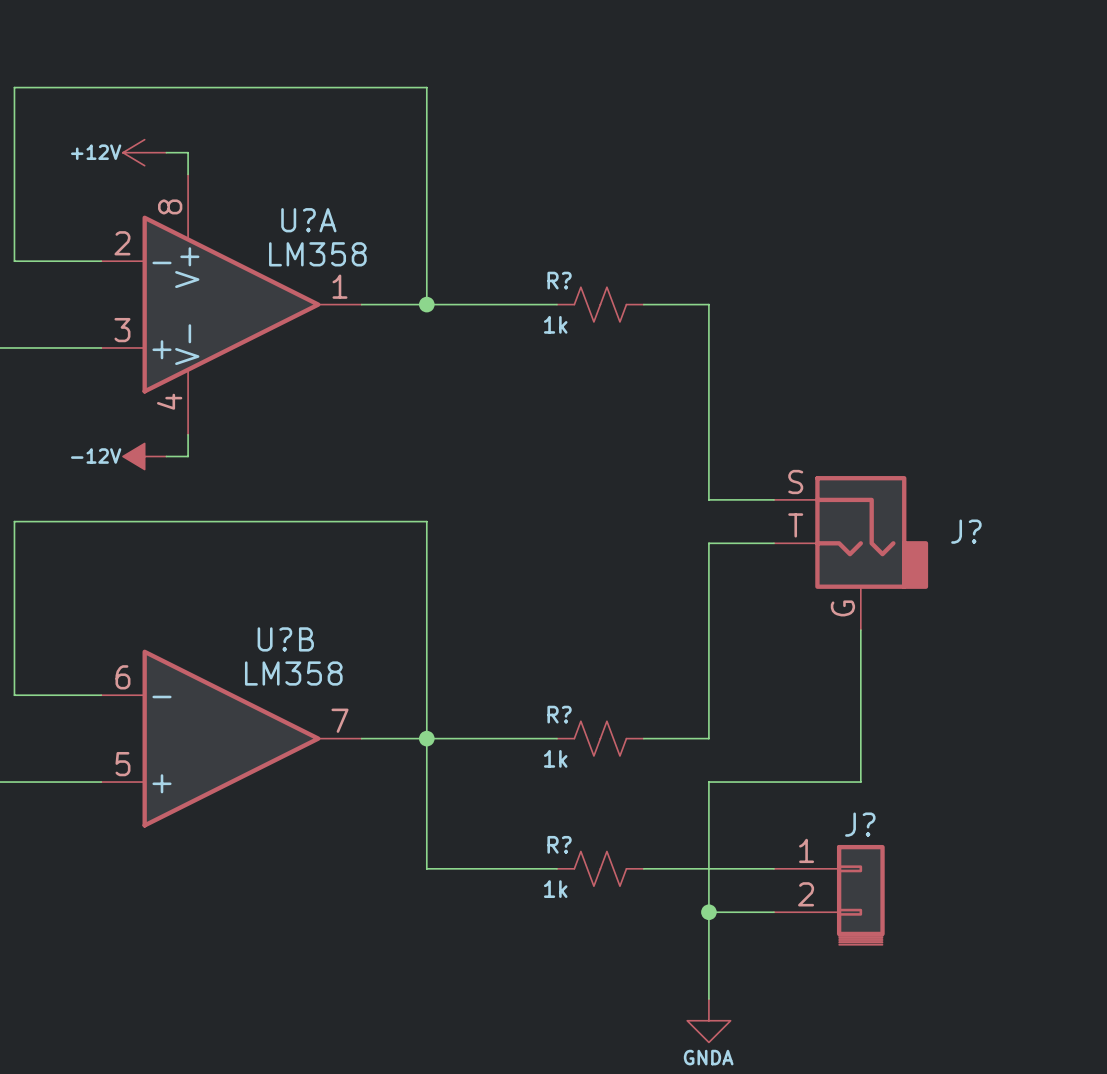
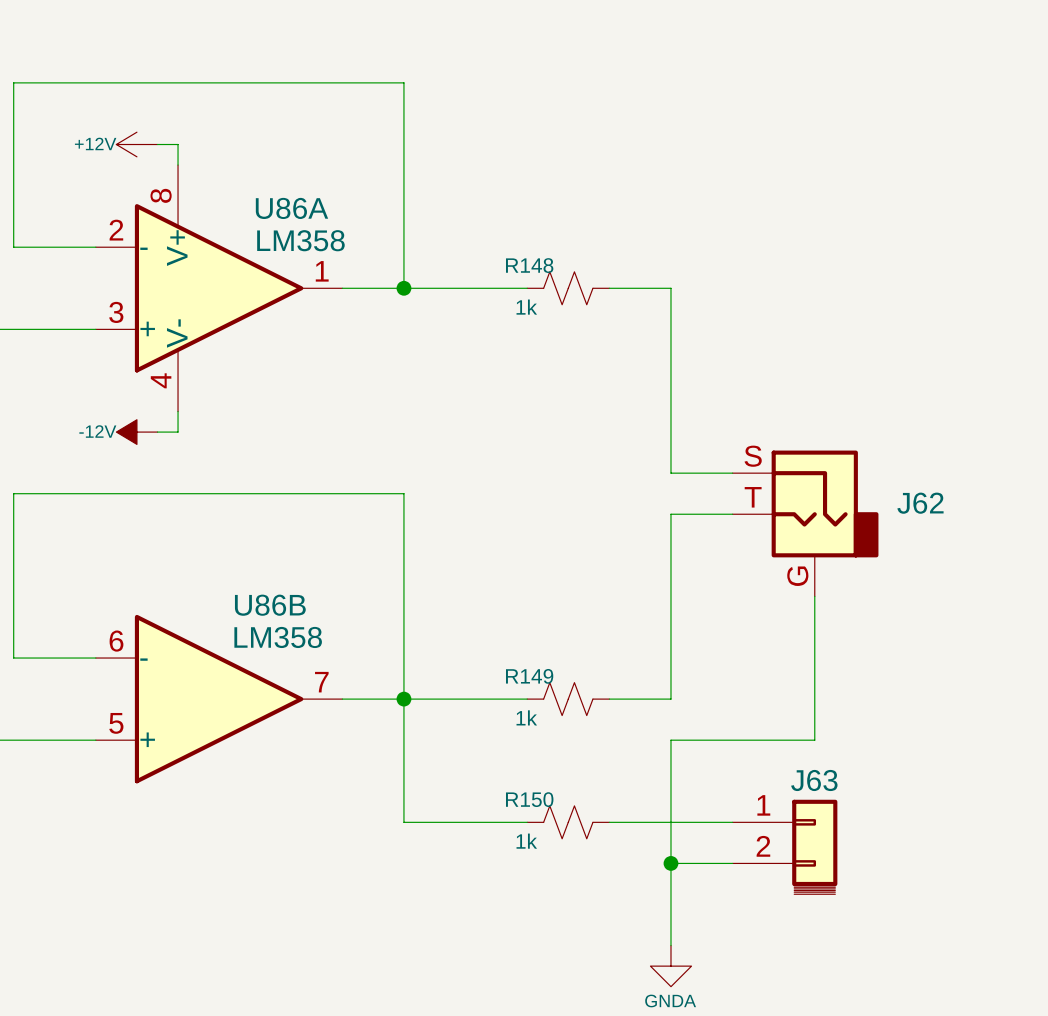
U?A name: U?A (308, 220) -> U86A (291, 208)
R? name: R? (559, 280) -> R148 (529, 265)
J? name: J? (966, 531) -> J62 (920, 503)
U?B name: U?B (285, 639) -> U86B (270, 605)
R? name: R? (559, 714) -> R149 (529, 676)
J? name: J? (860, 824) -> J63 (814, 780)
R? name: R? (559, 844) -> R150 (529, 799)

